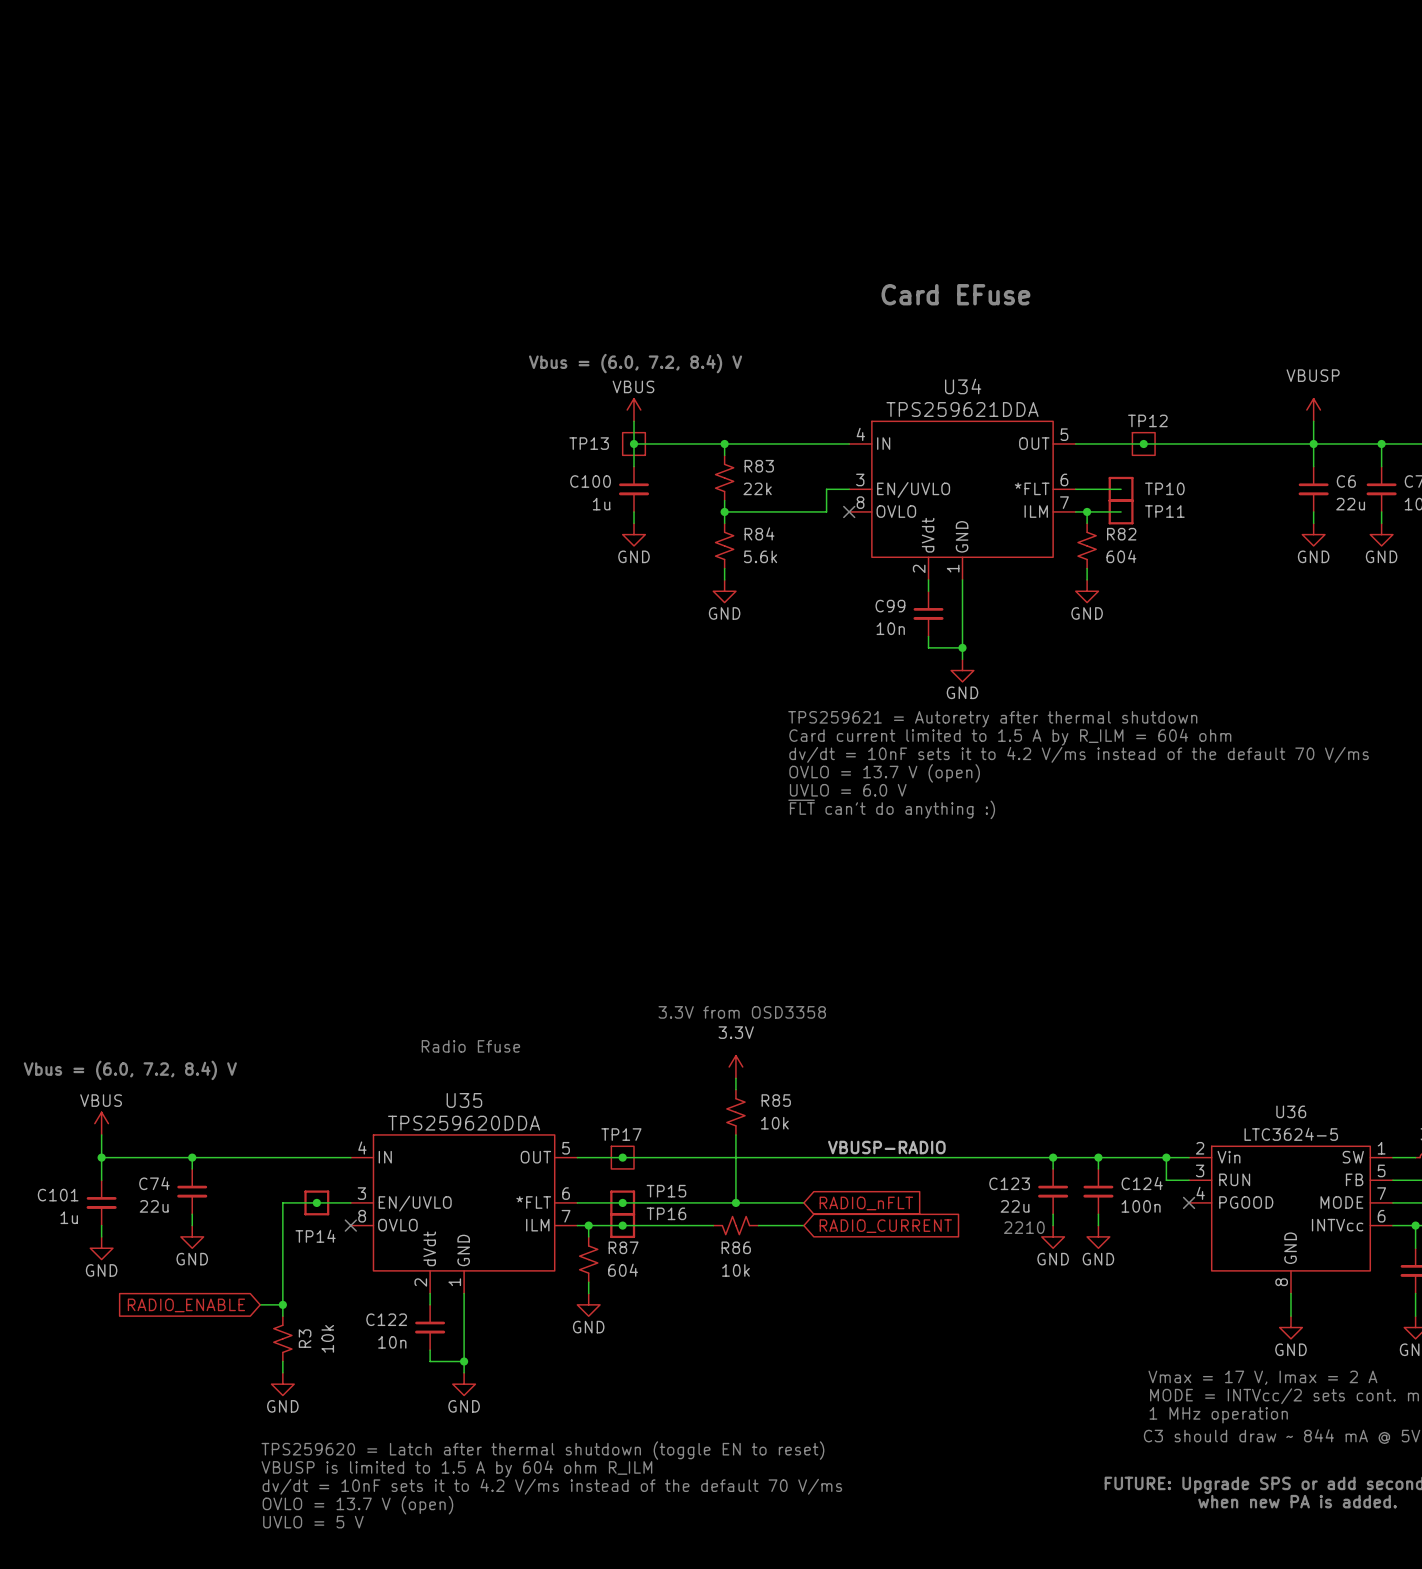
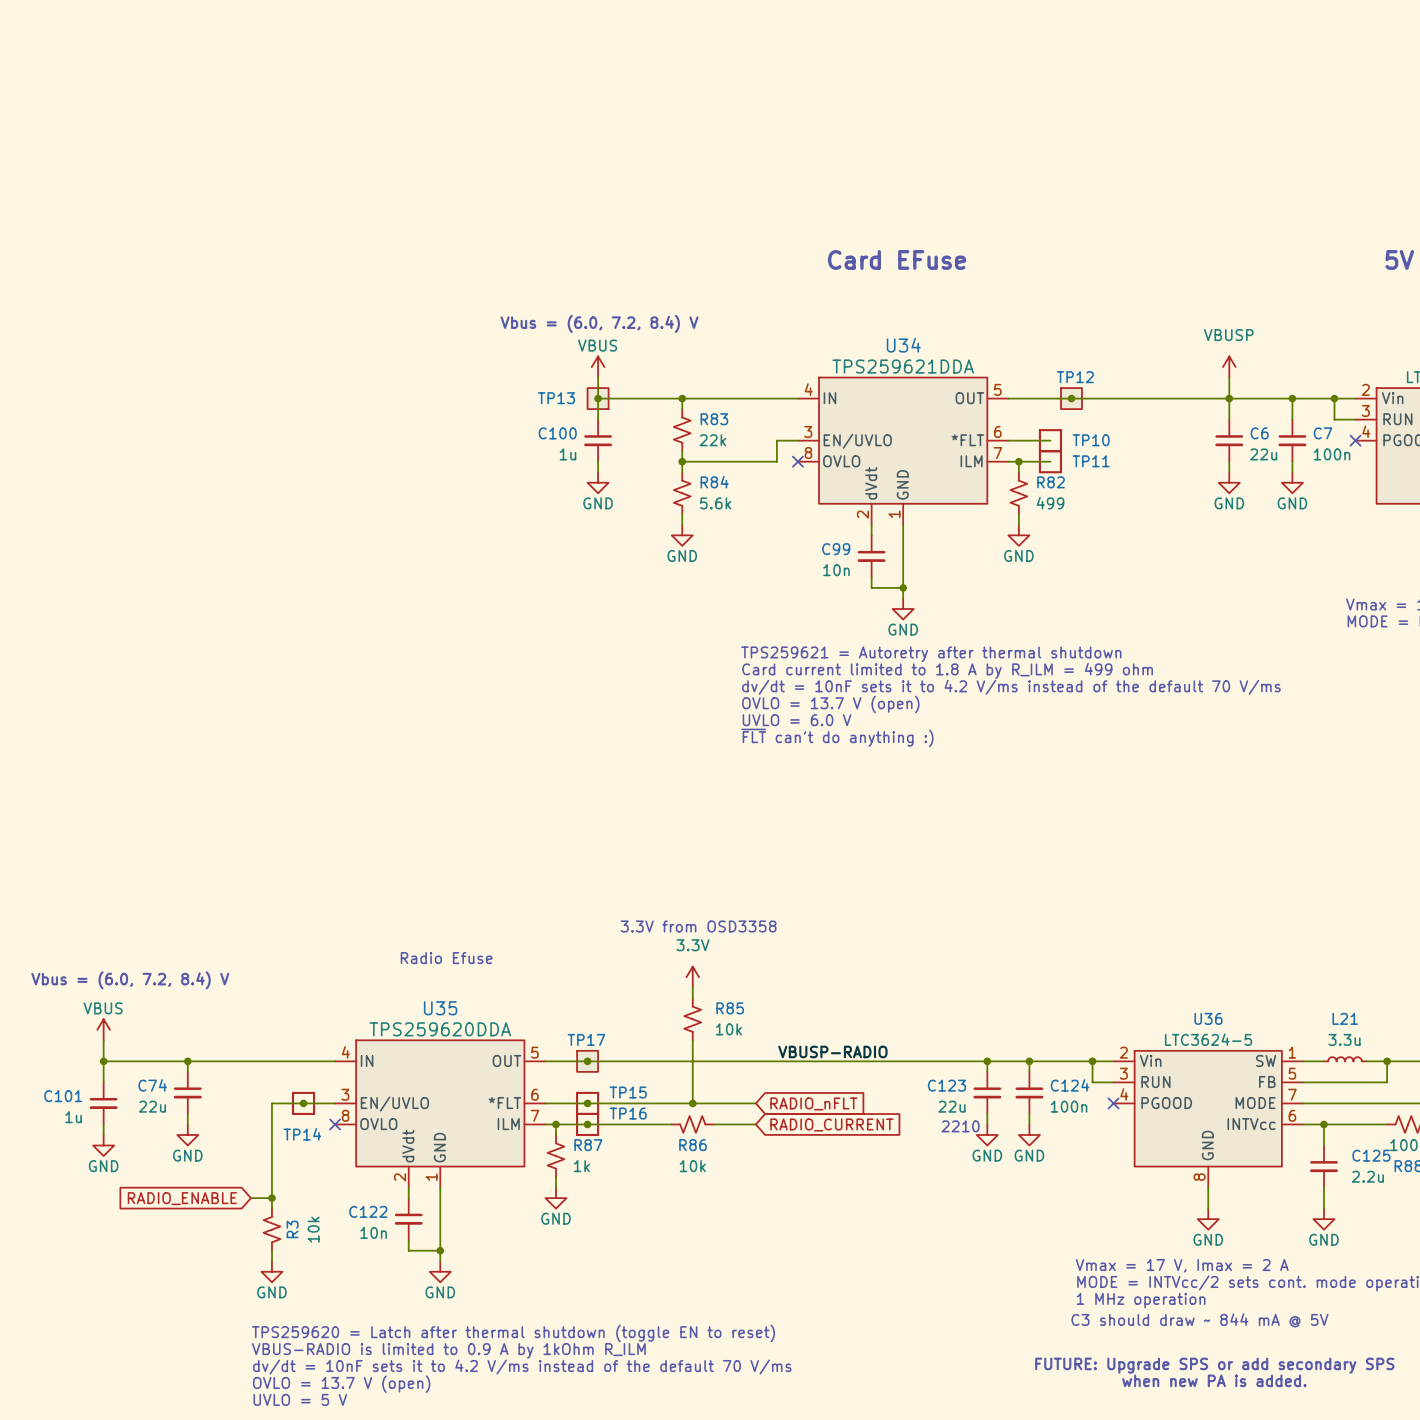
R82 value: 604 (1121, 556) -> 499 (1050, 503)
text: Card current limited to 1.5 A by R_ILM = 604 ohm (1010, 737) -> Card current limited to 1.8 A by R_ILM = 499 ohm (947, 670)
R87 value: 604 (623, 1270) -> 1k (581, 1166)
text: VBUSP is limited to 1.5 A by 604 ohm R_ILM (456, 1469) -> VBUS-RADIO is limited to 0.9 A by 1kOhm R_ILM (448, 1350)

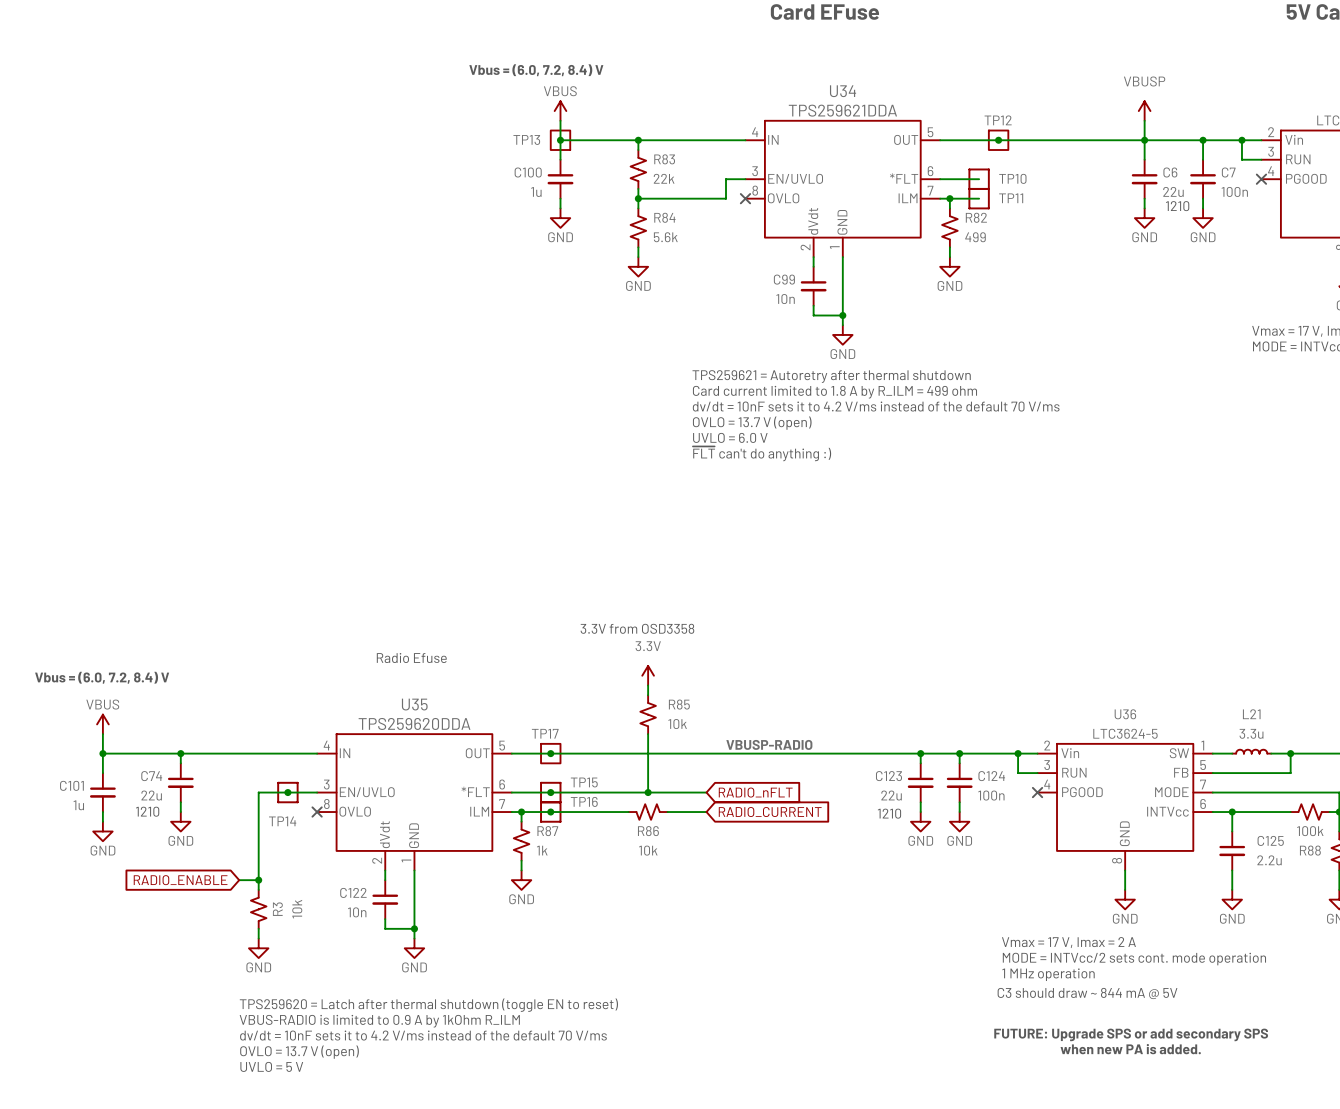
text: none -> 1210 (1177, 206)
text: none -> 1210 (147, 811)
text: 2210 (960, 1126) -> 1210 (889, 813)

